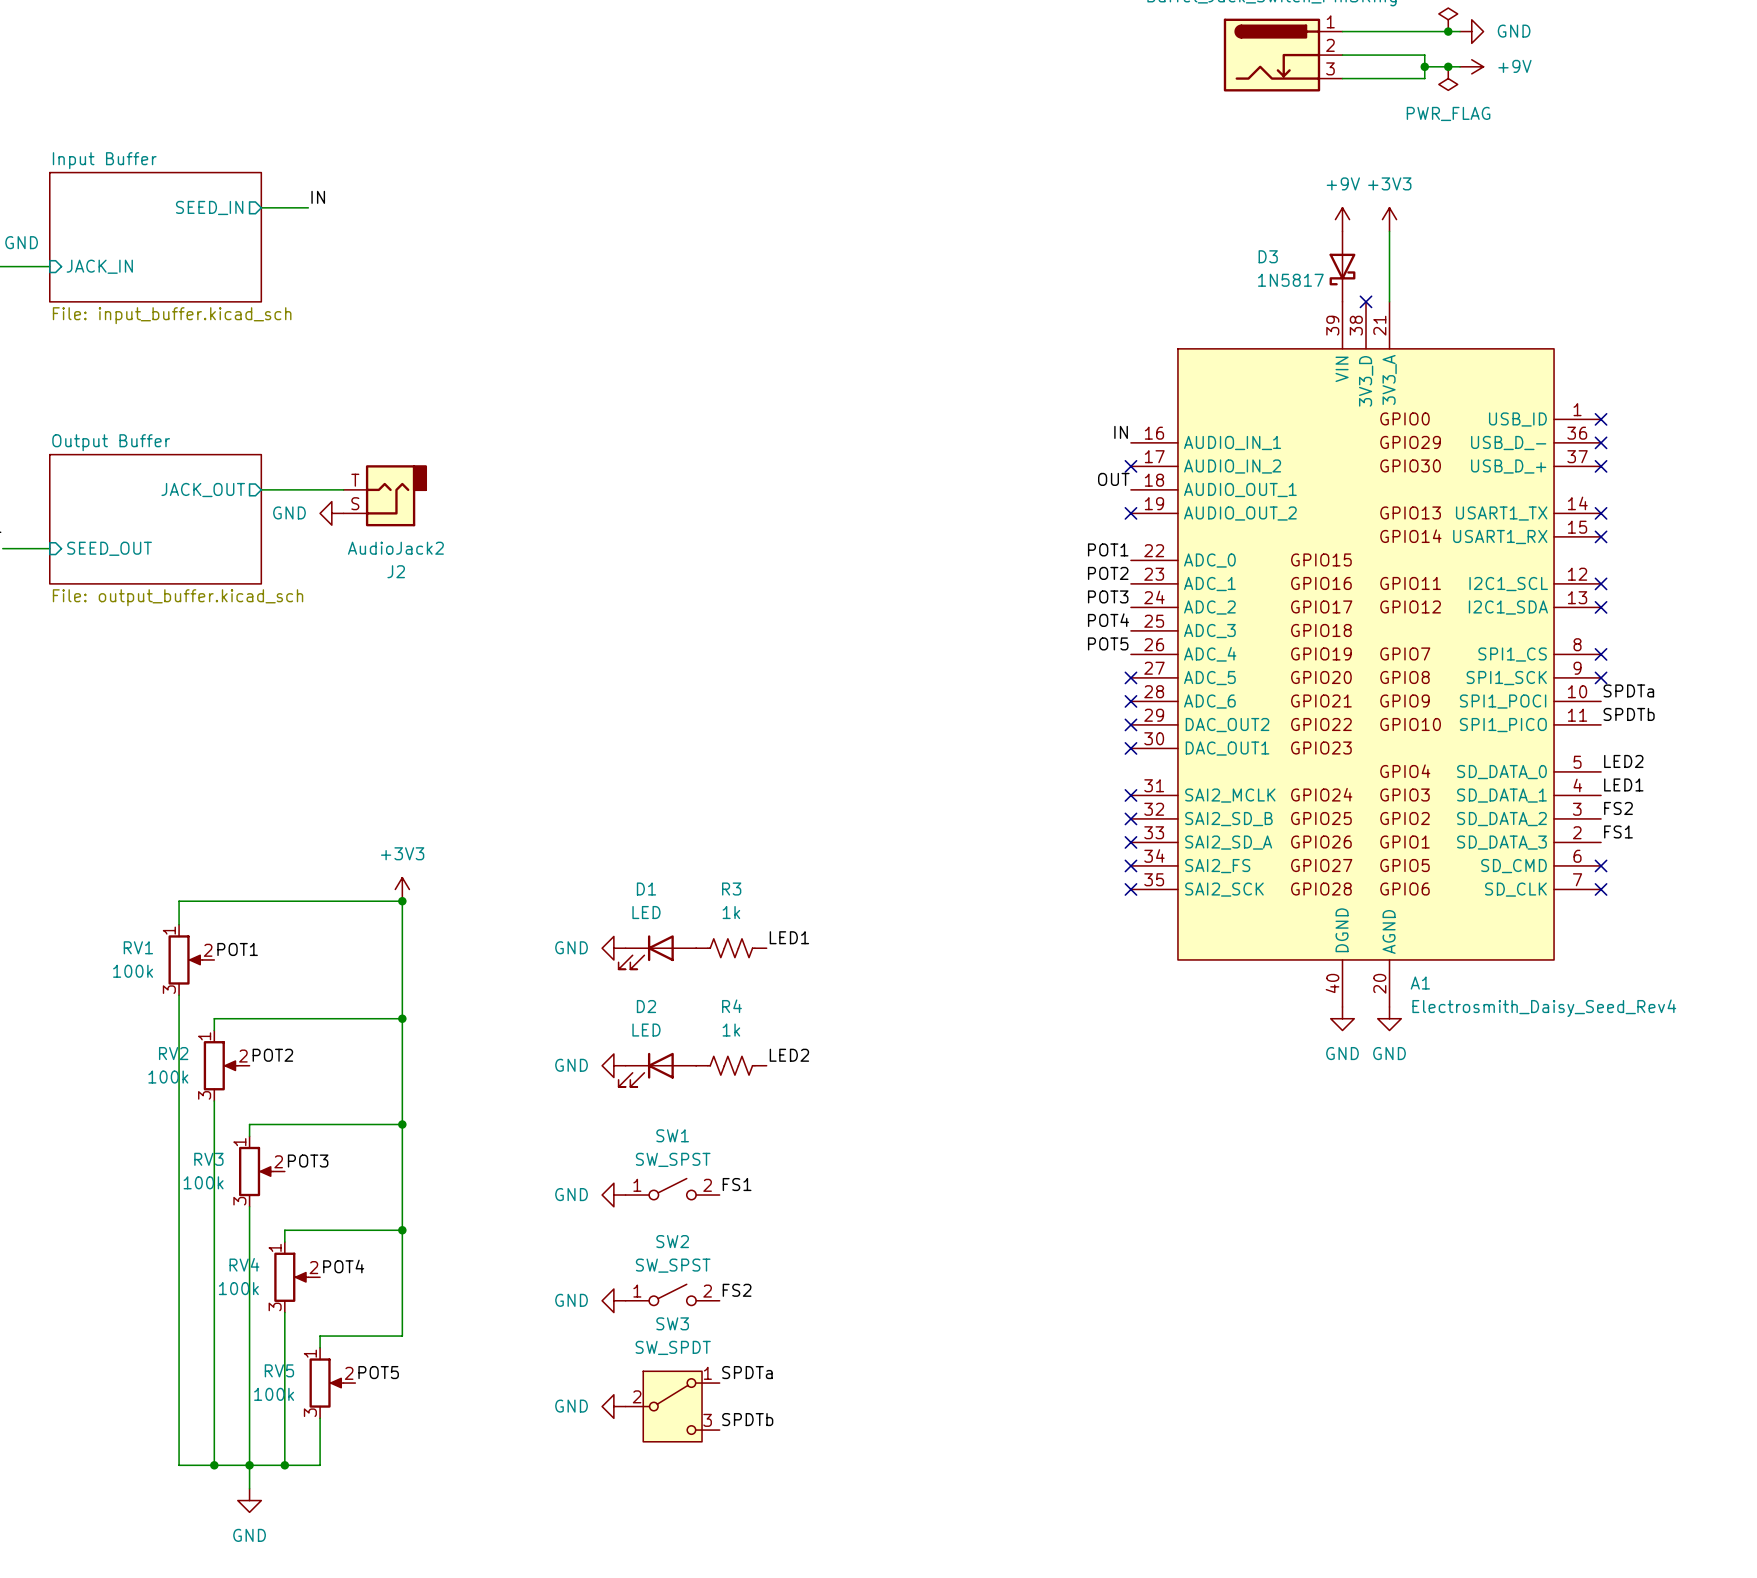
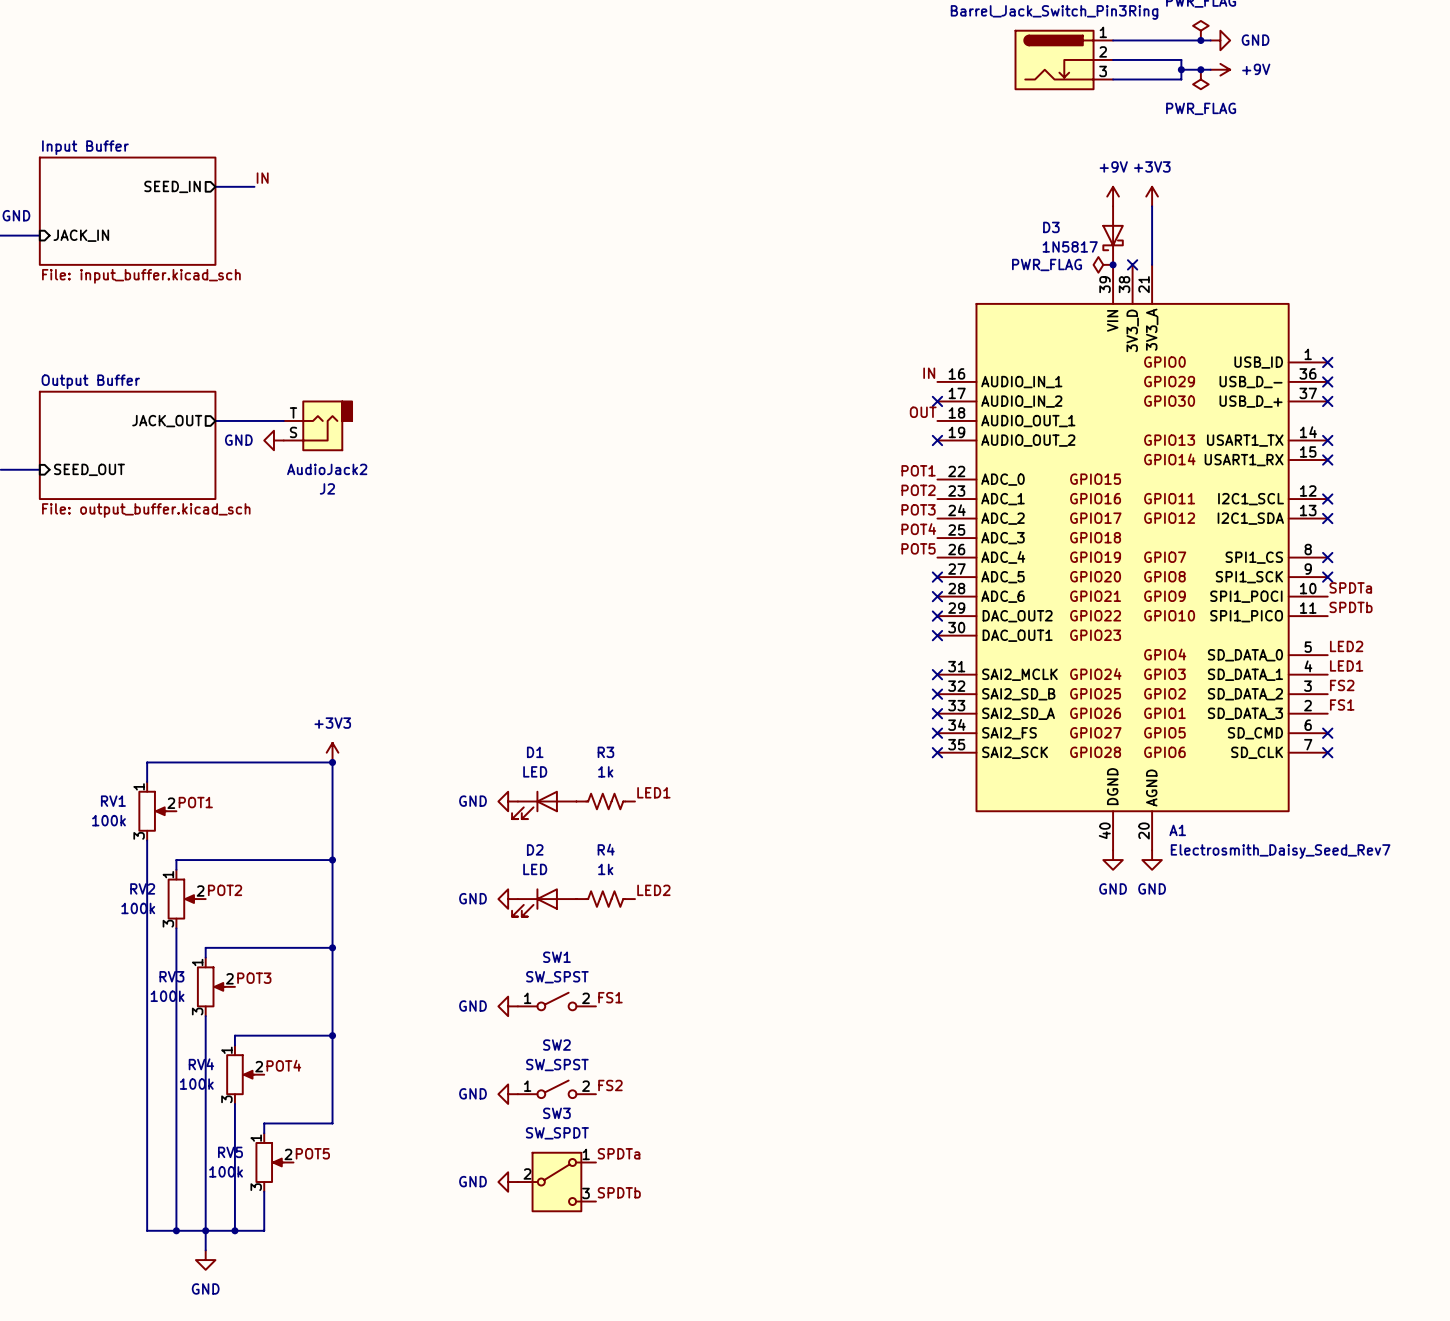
power symbol: none -> PWR_FLAG (1103, 264)
junction: none -> (1113, 264)
A1 value: Electrosmith_Daisy_Seed_Rev4 (1544, 1008) -> Electrosmith_Daisy_Seed_Rev7 (1280, 851)

